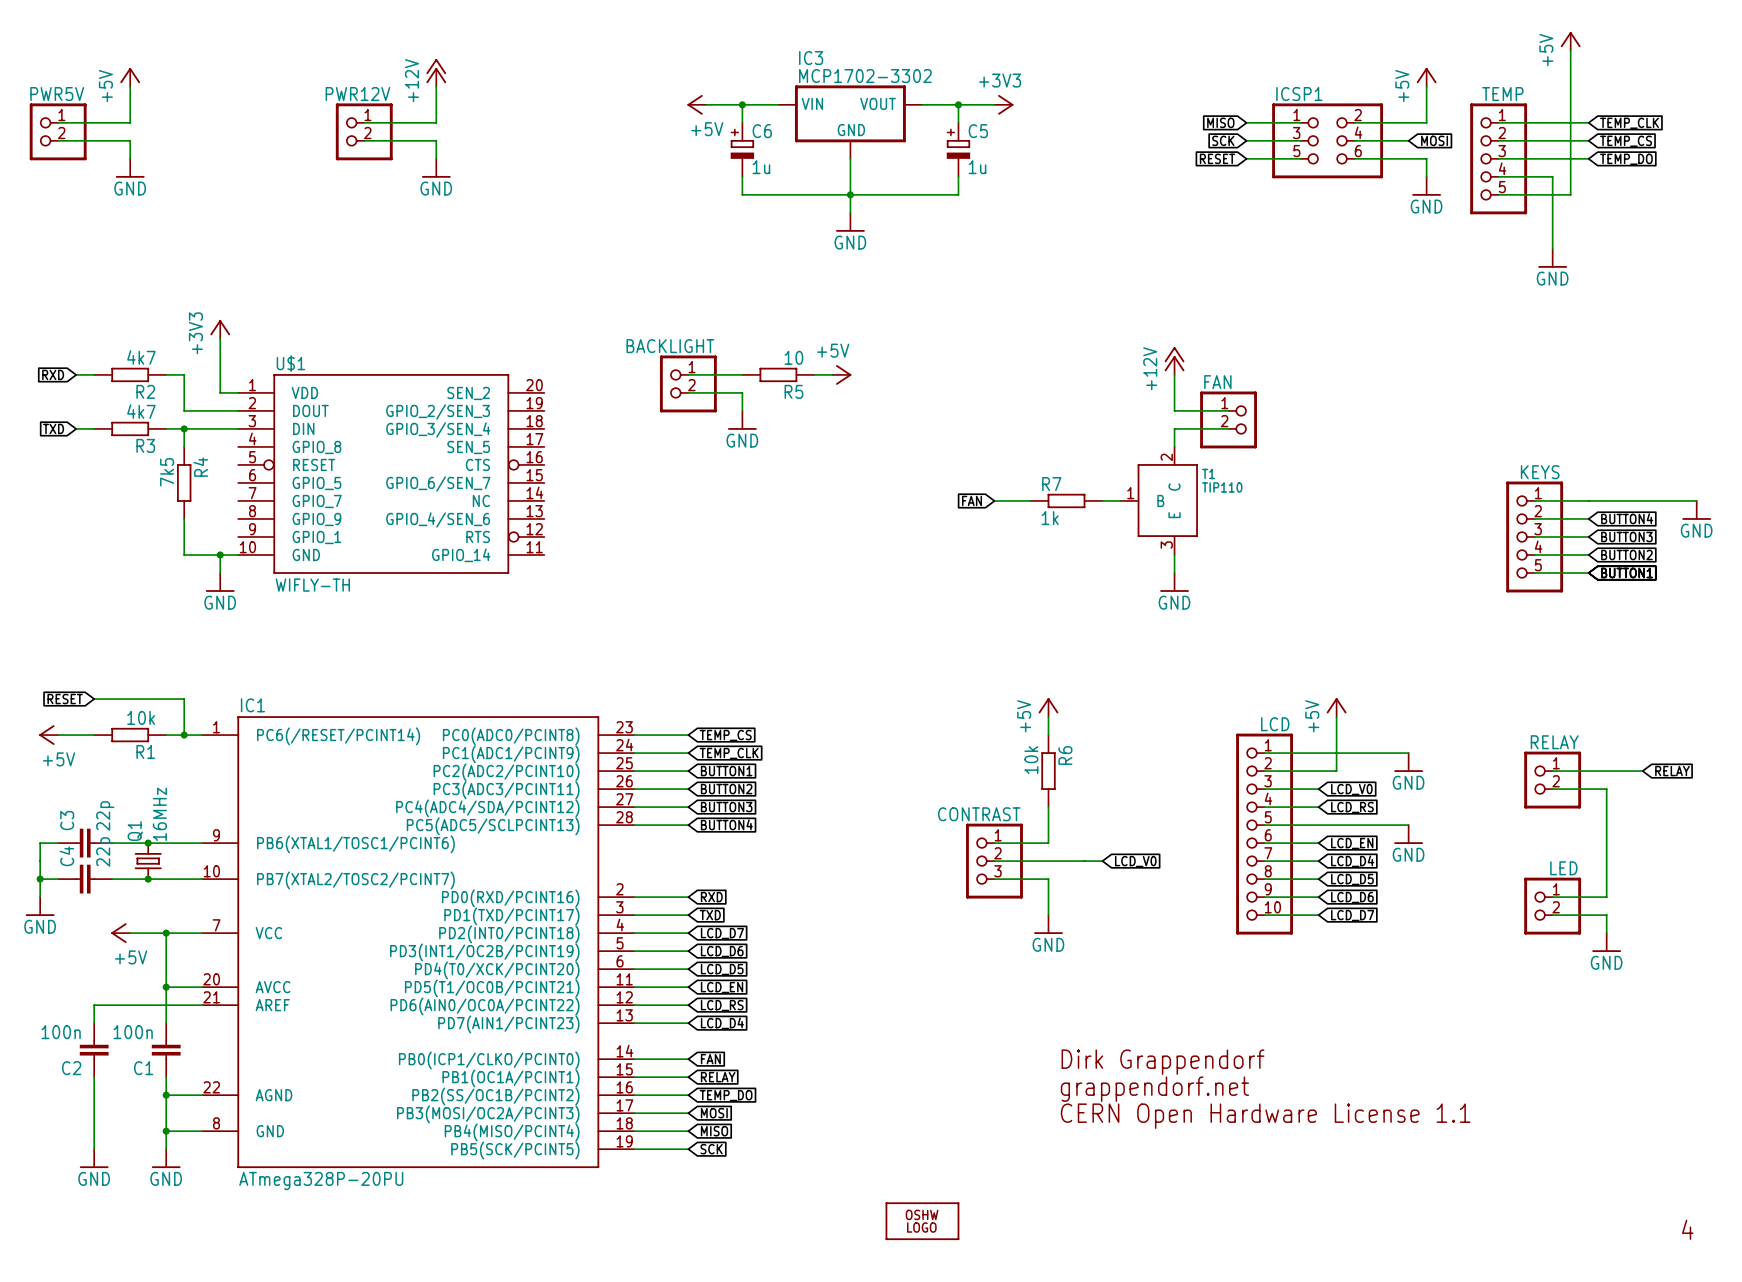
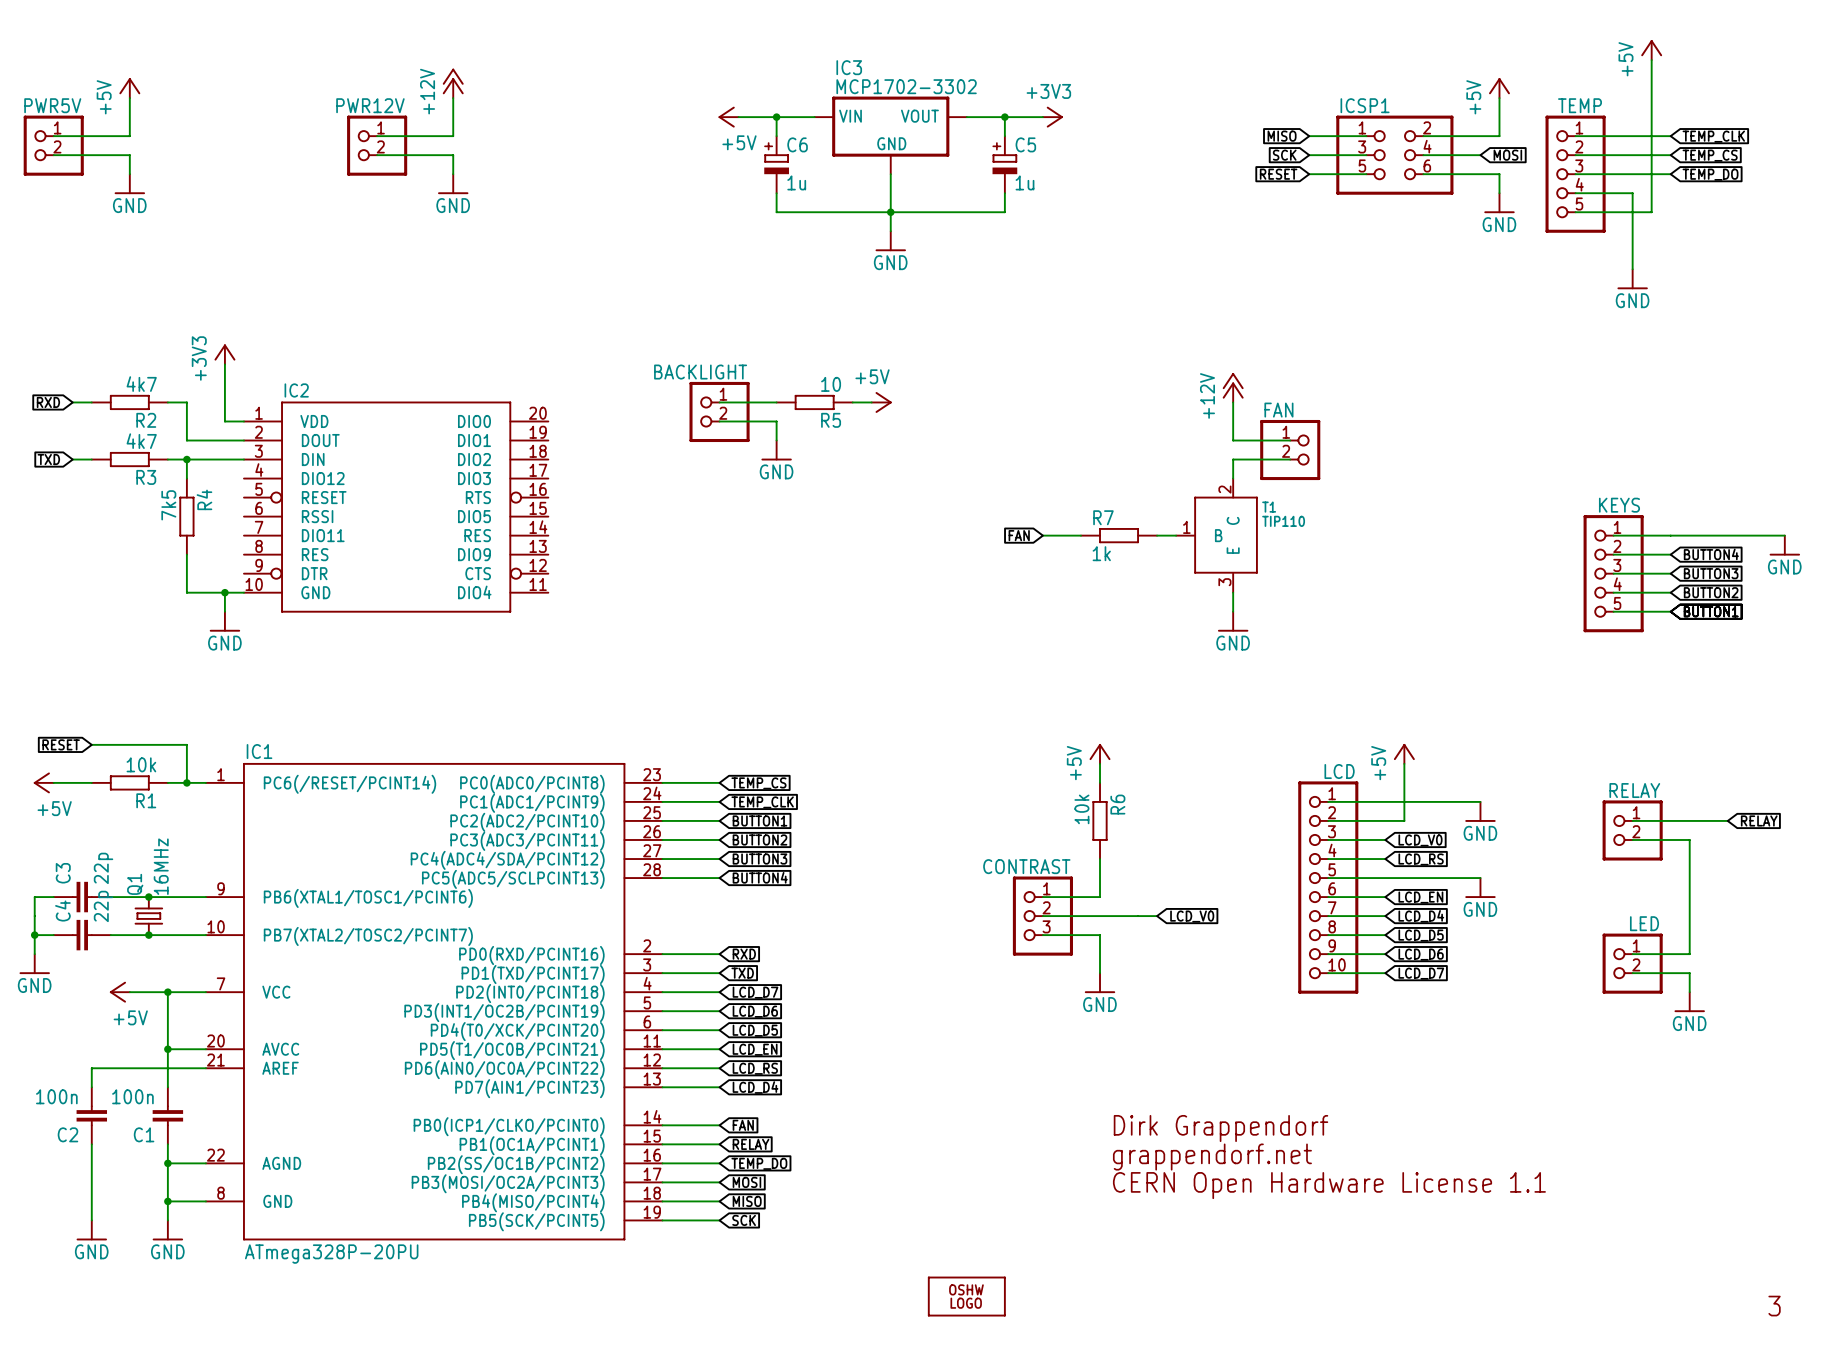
IC2: none -> (396, 507)
U$1: WIFLY-TH (391, 473) -> none
text: 4 (1687, 1229) -> 3 (1774, 1306)

